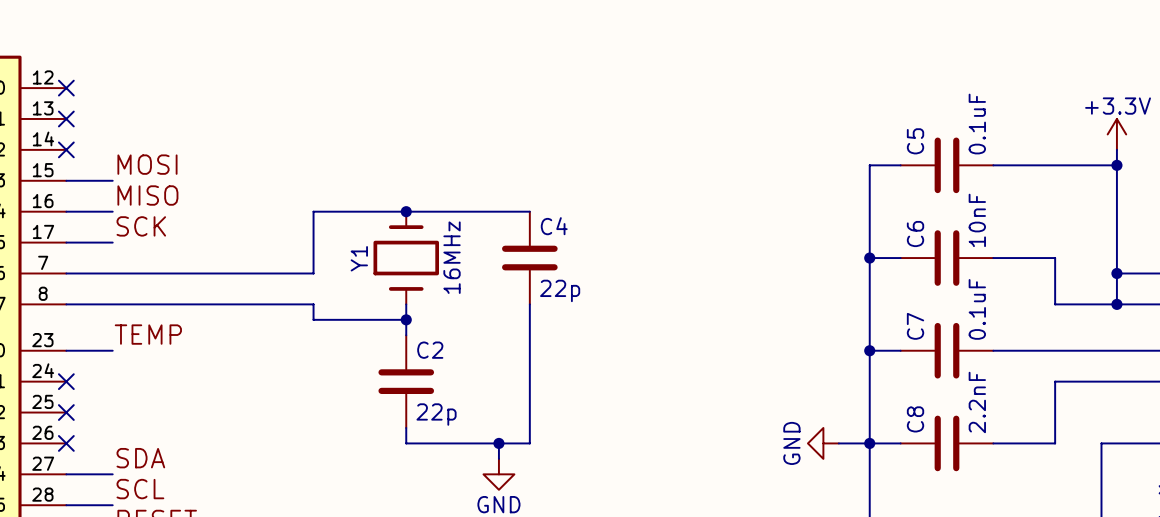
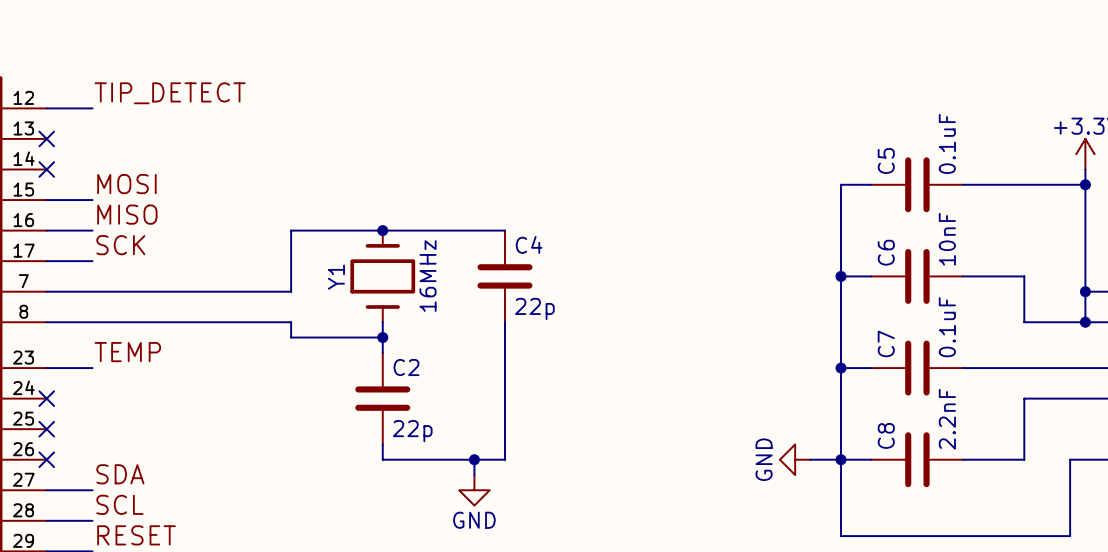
label: none -> TIP_DETECT (170, 93)
wire: none -> (46, 108) (92, 108)
no-connect mark: (66, 88) -> none

